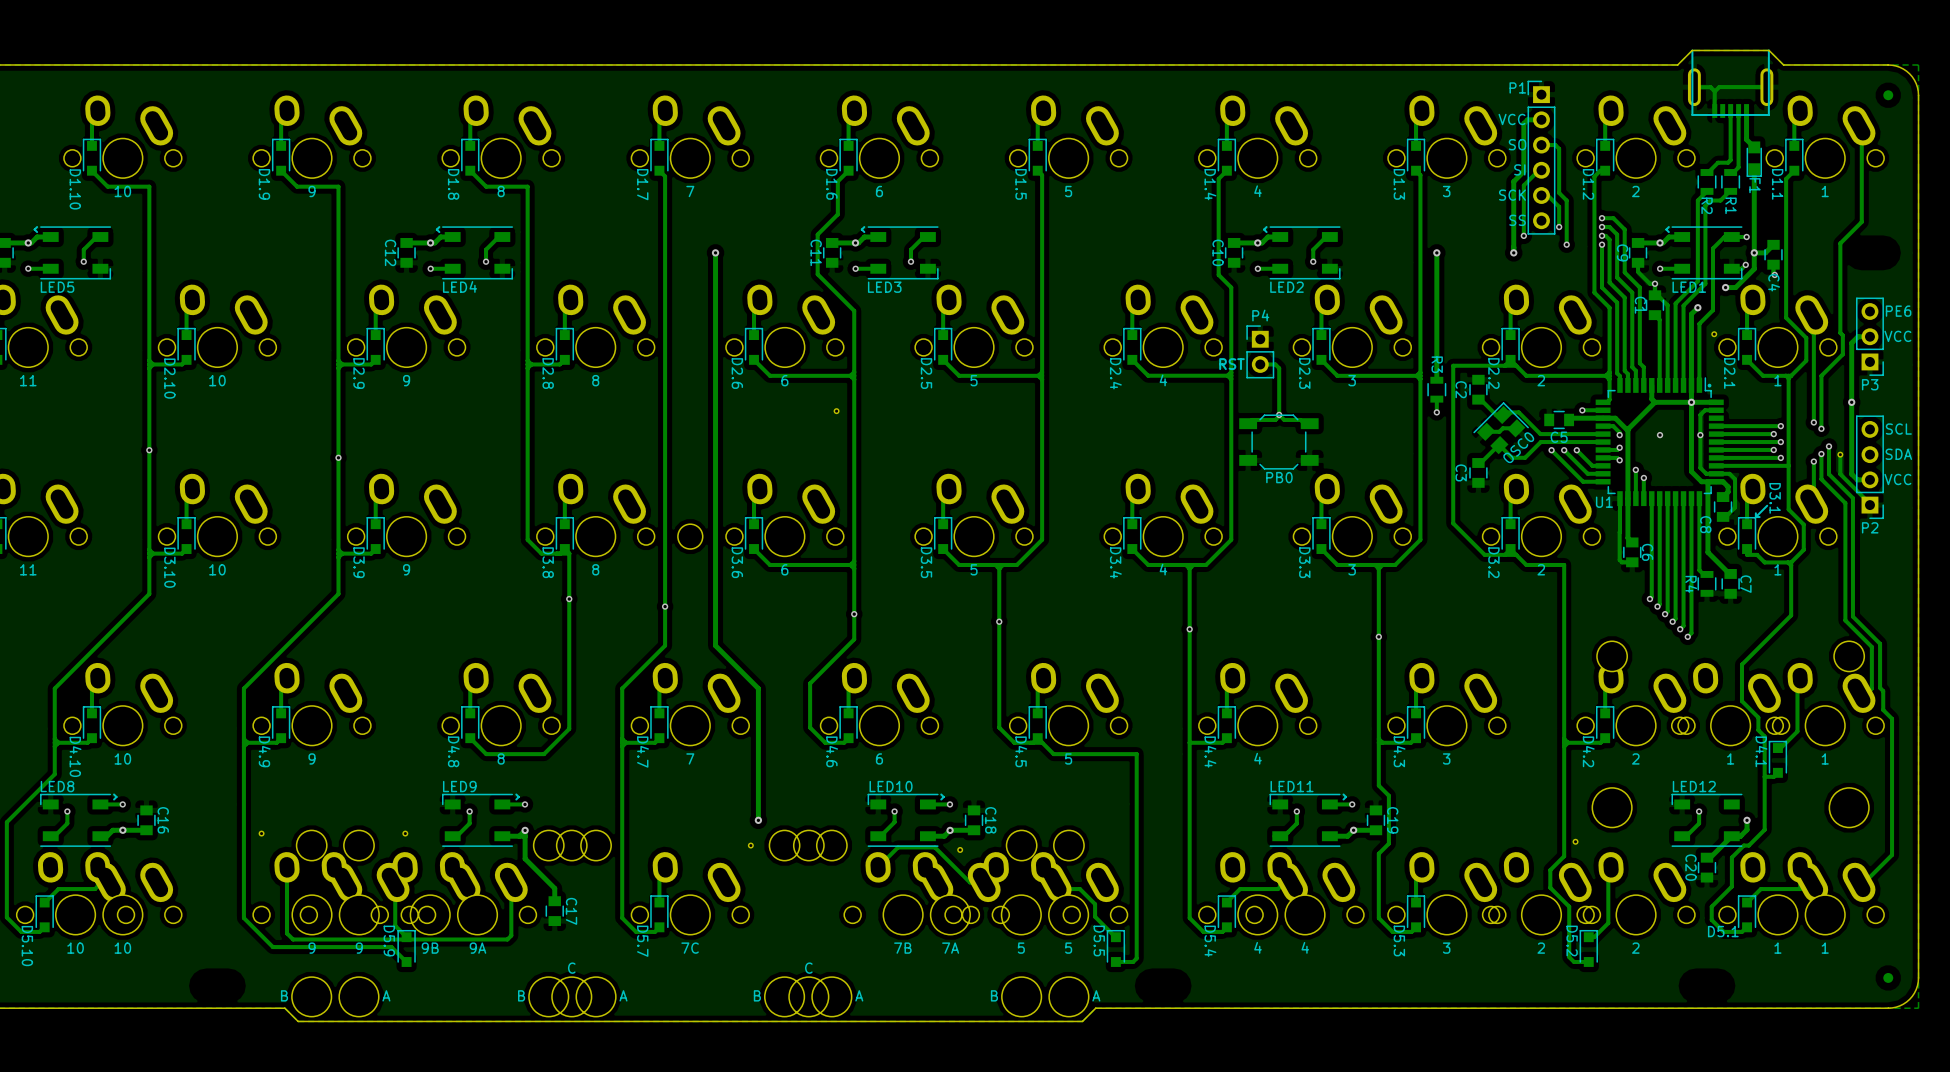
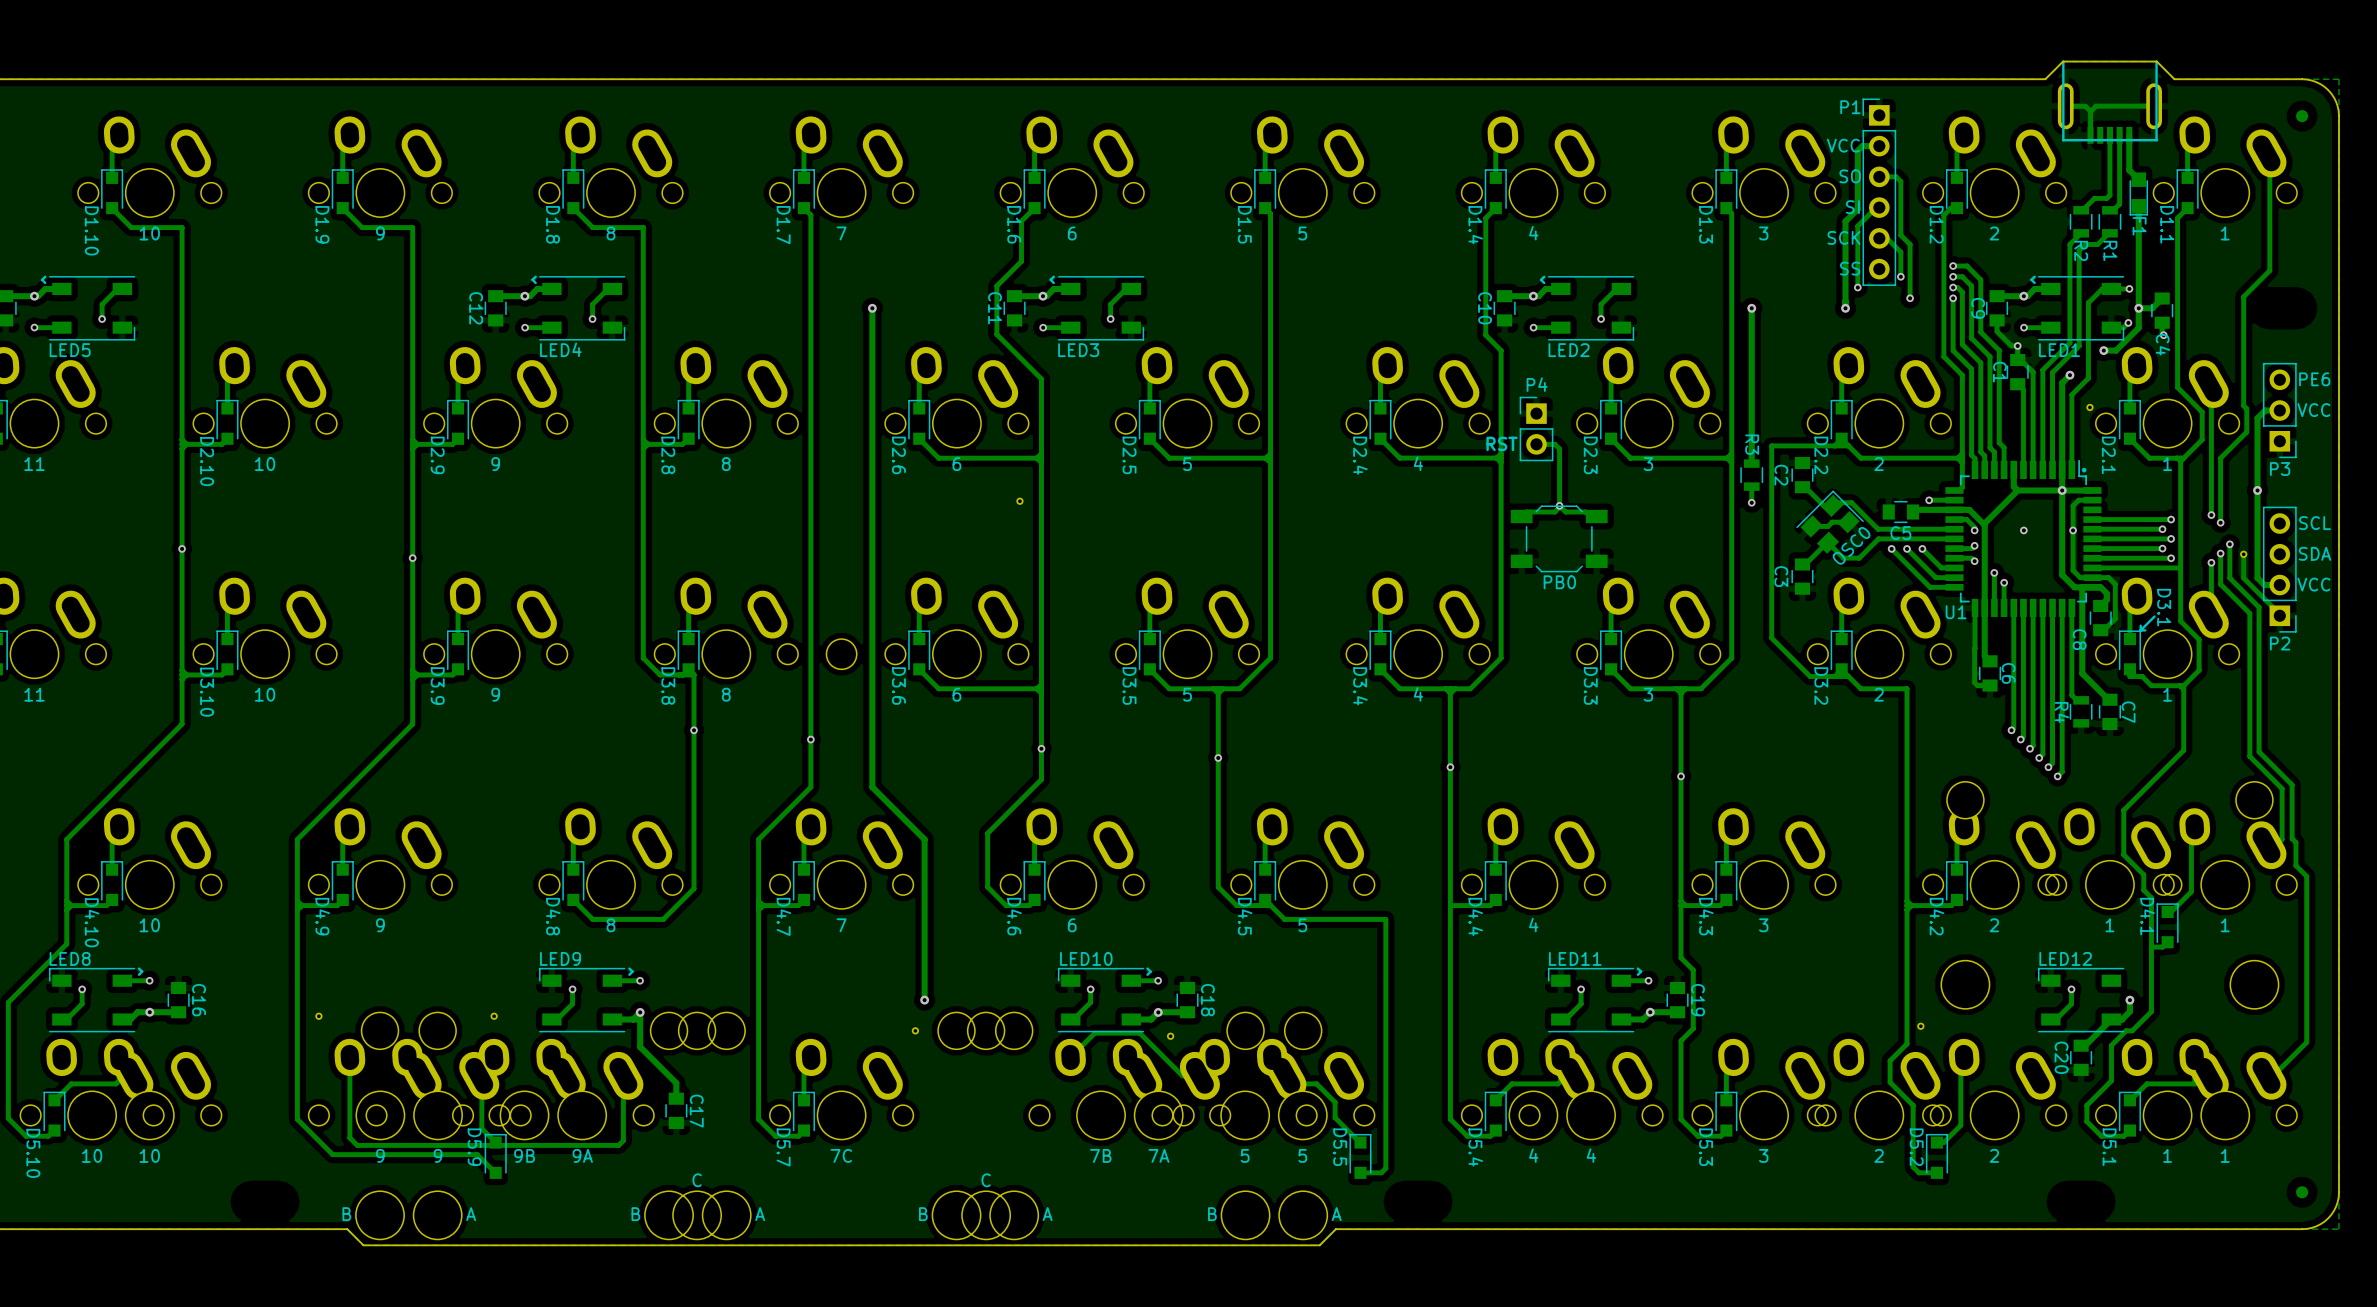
D5.1 name rotation: 0° (1723, 931) -> 90° clockwise (2109, 1147)

